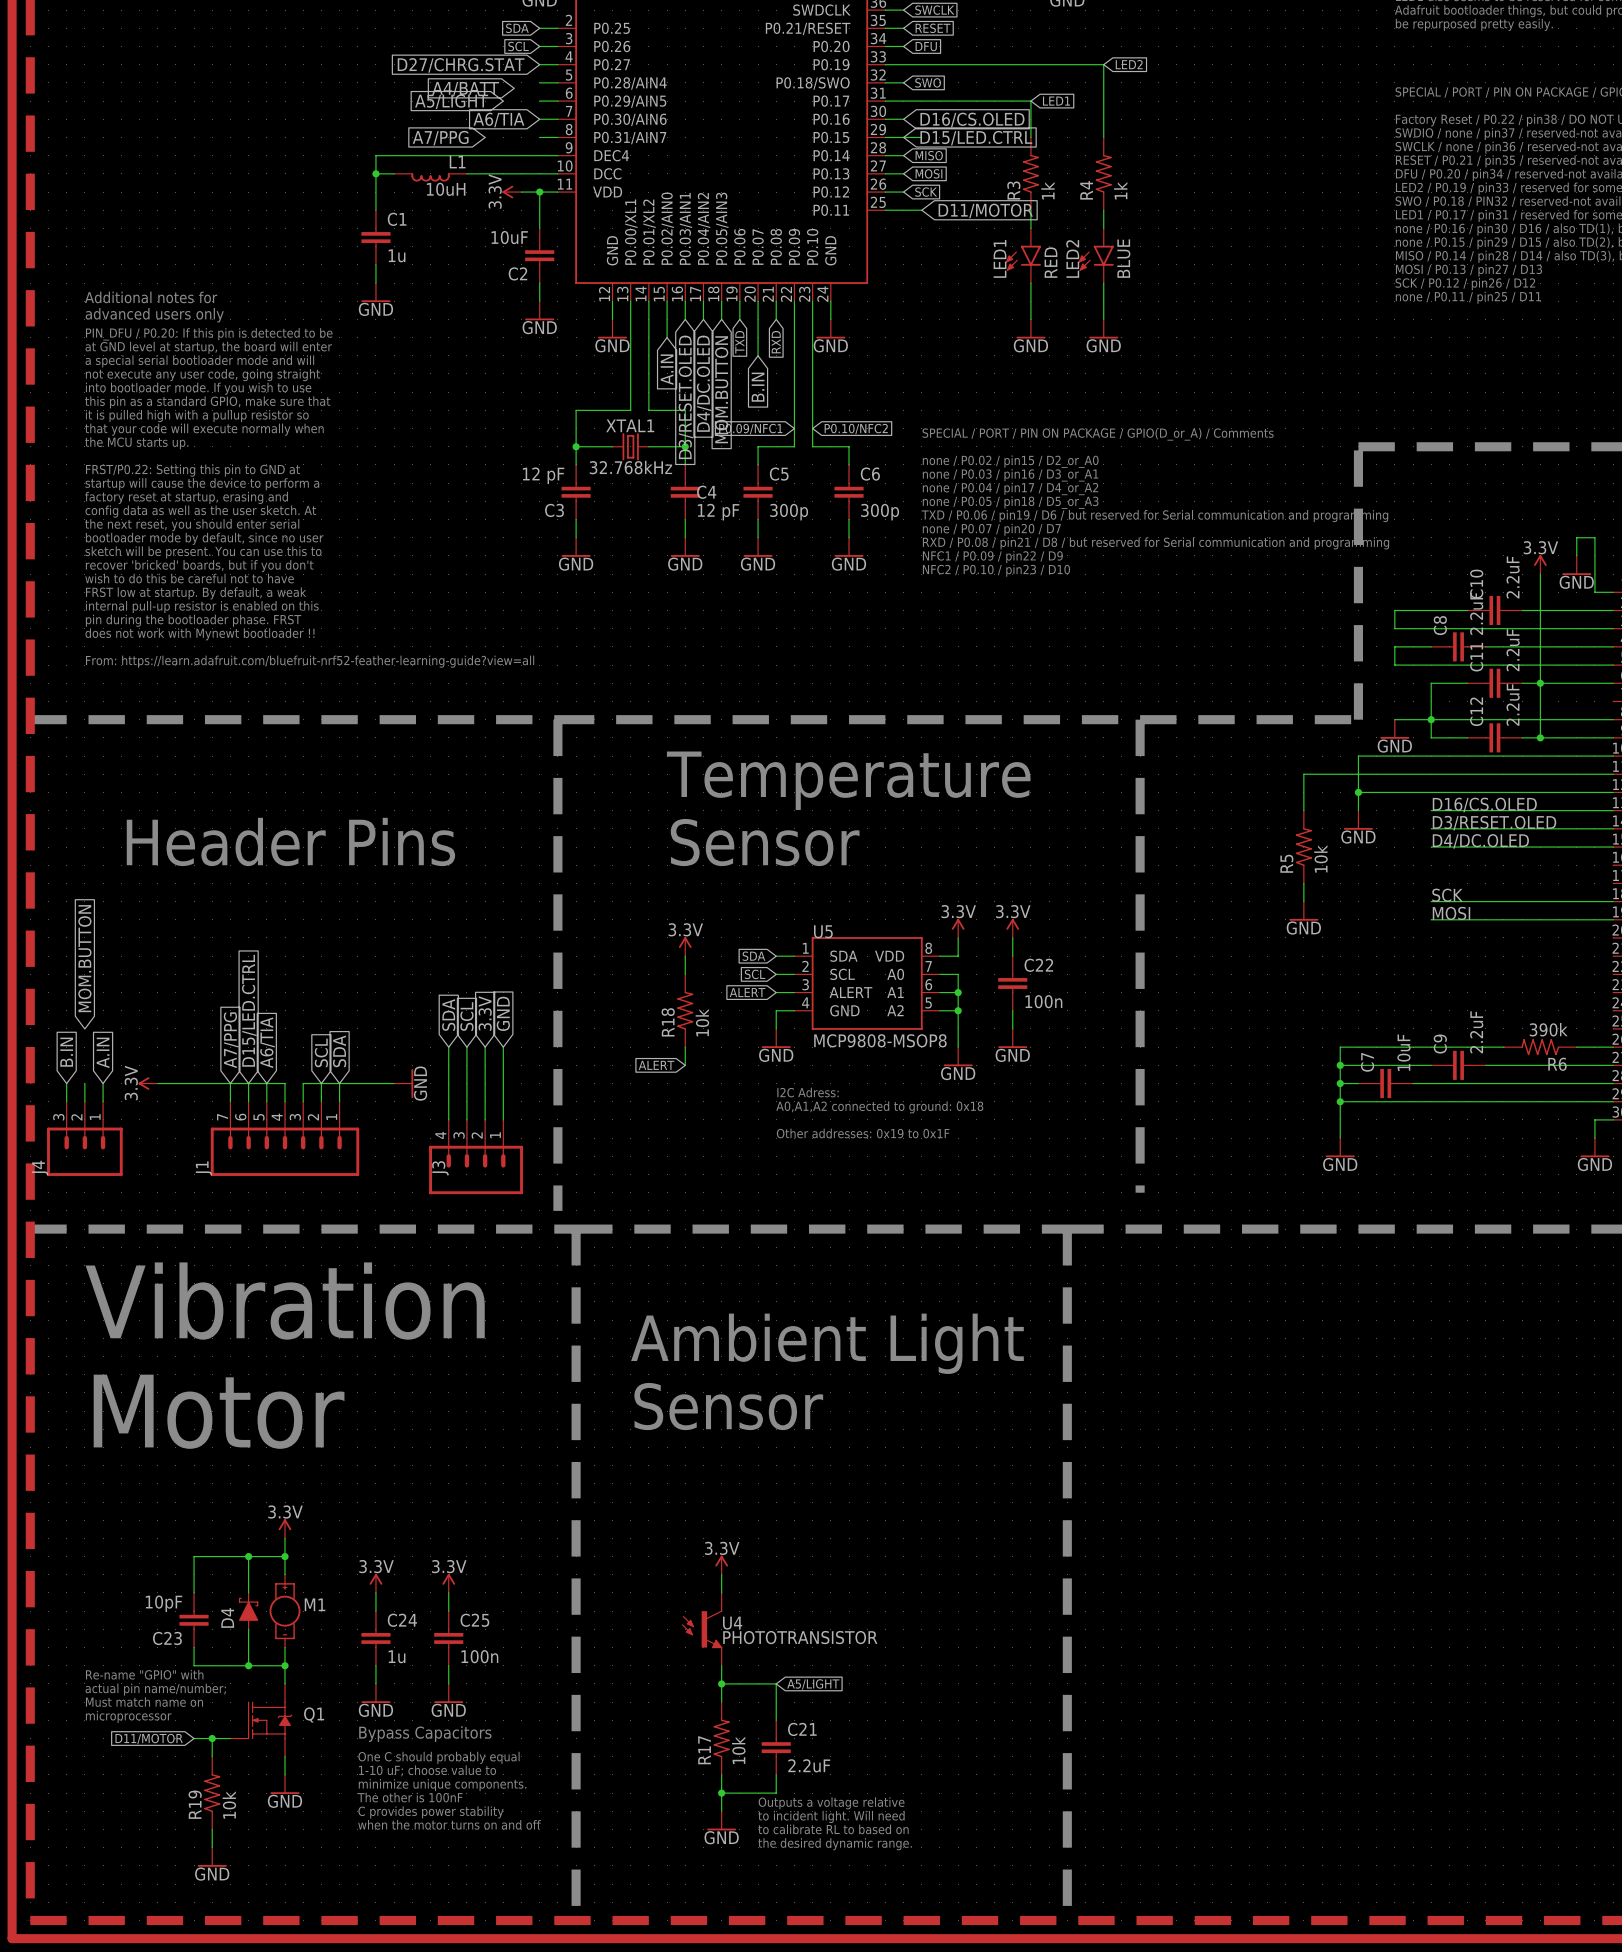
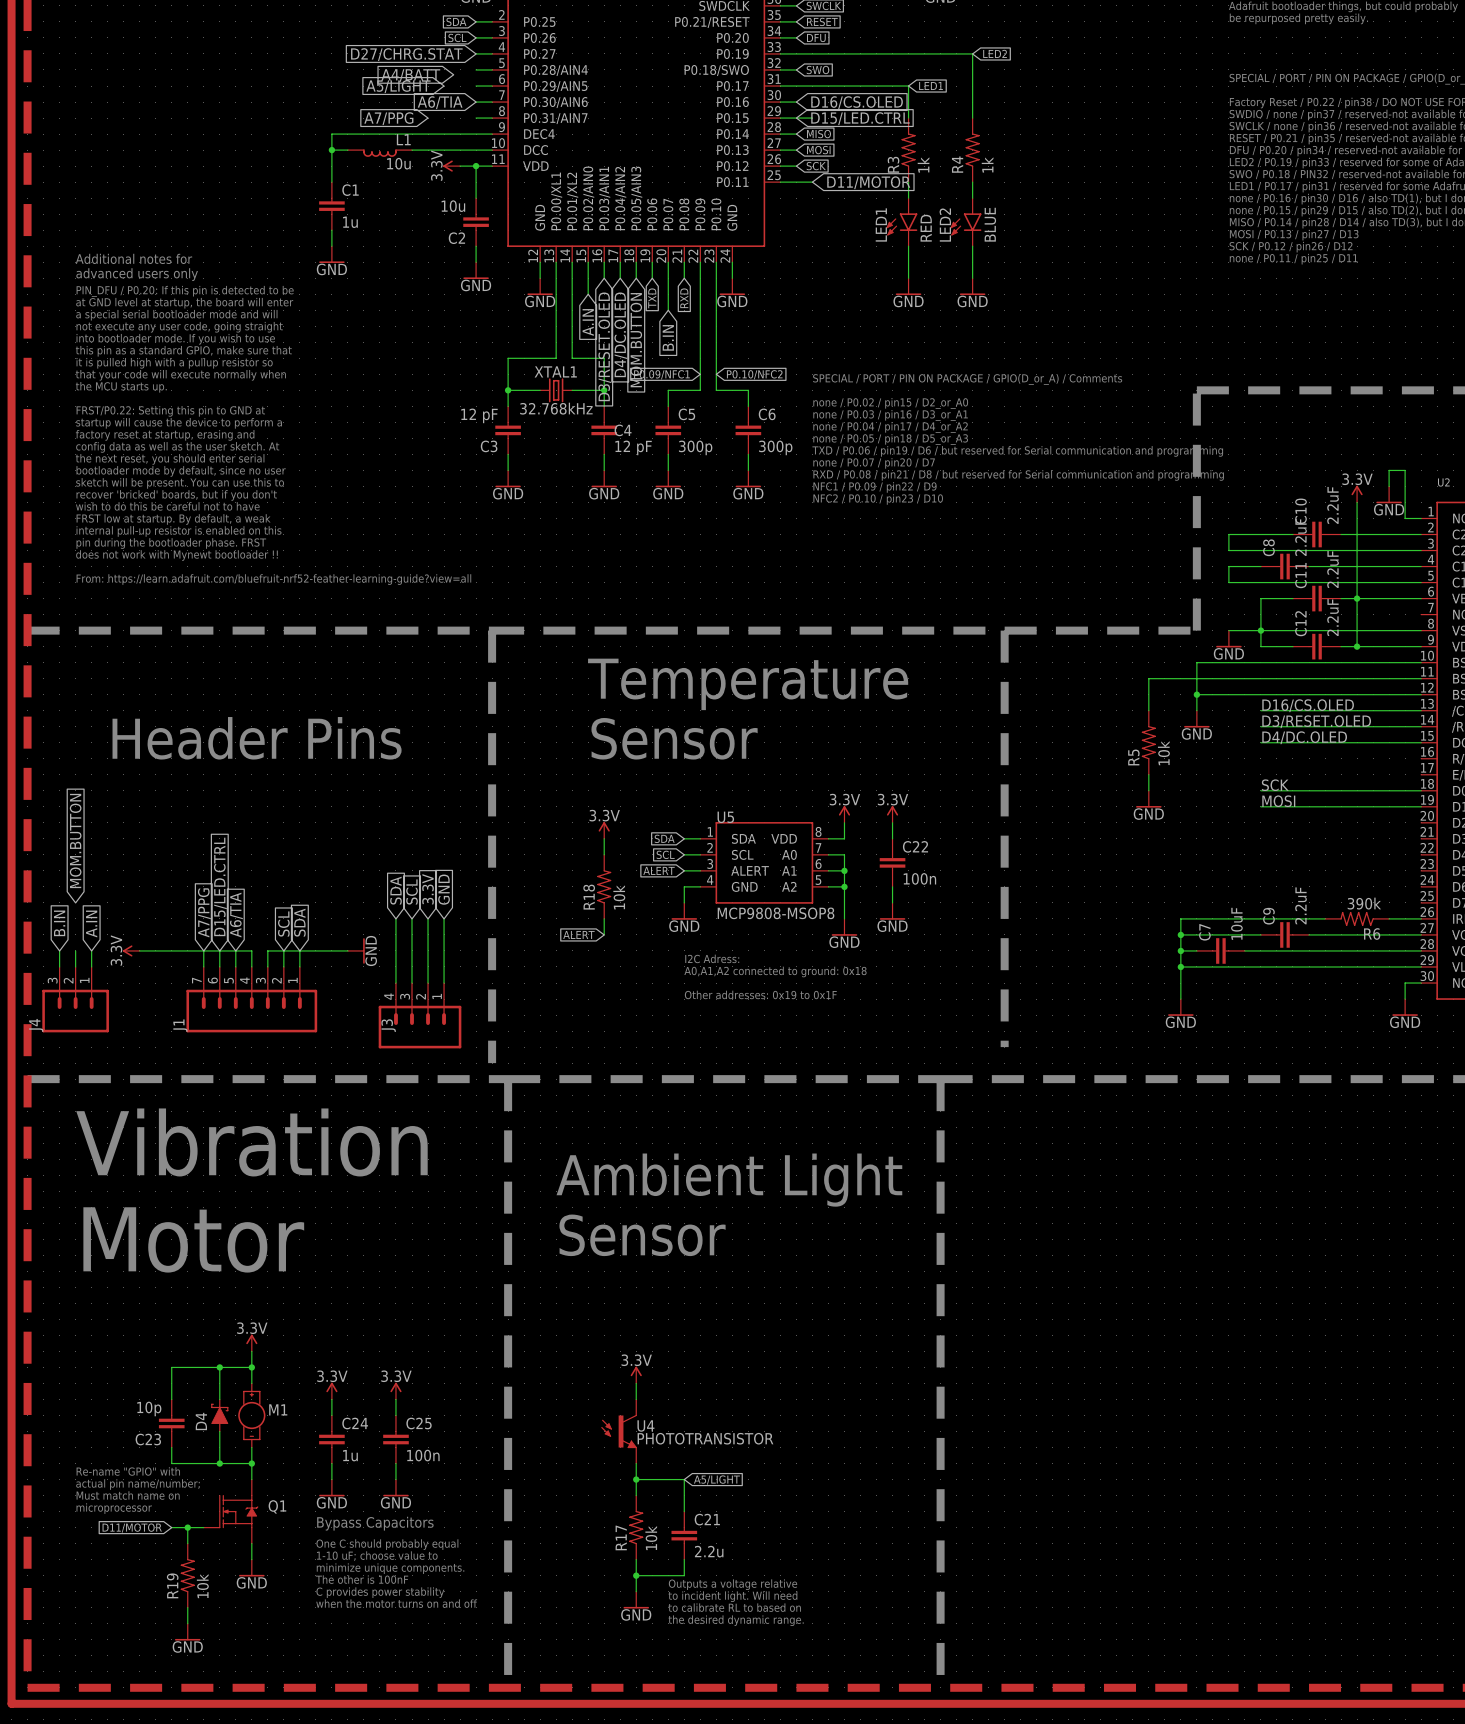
L1 value: 10uH (446, 189) -> 10u (398, 163)
C2 value: 10uF (509, 237) -> 10u (453, 206)
C23 value: 10pF (164, 1603) -> 10p (149, 1408)
C21 value: 2.2uF (809, 1765) -> 2.2u (709, 1551)

